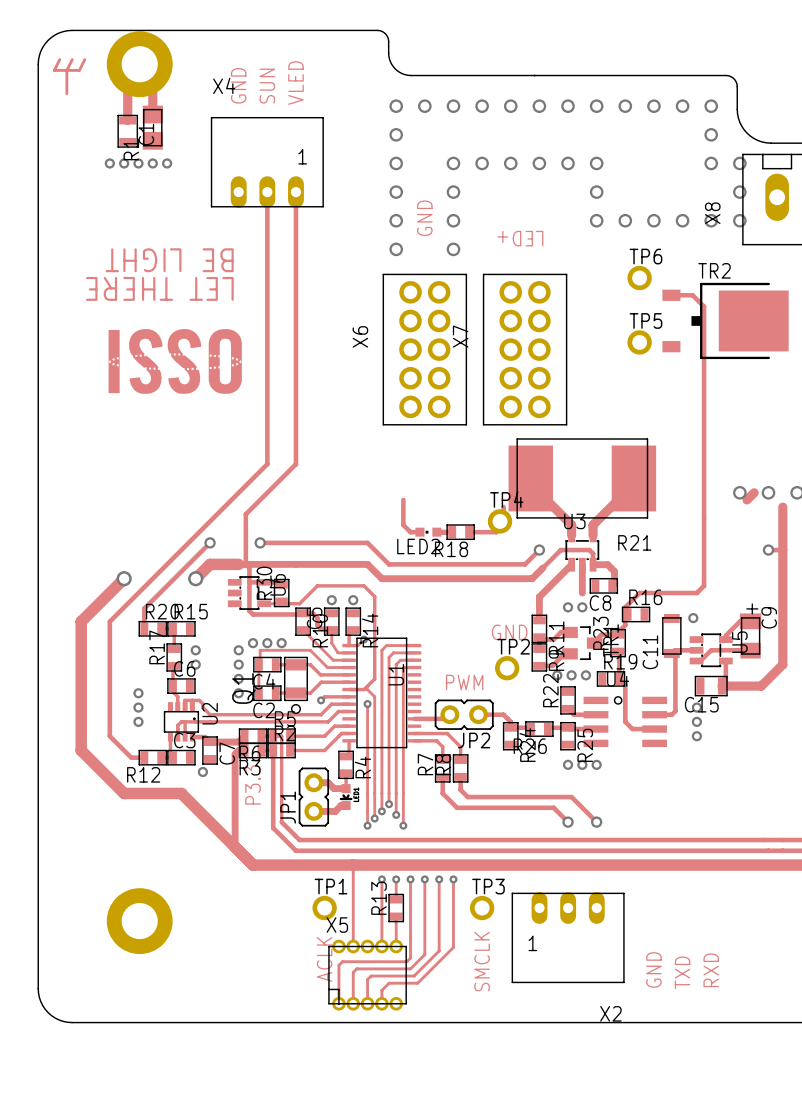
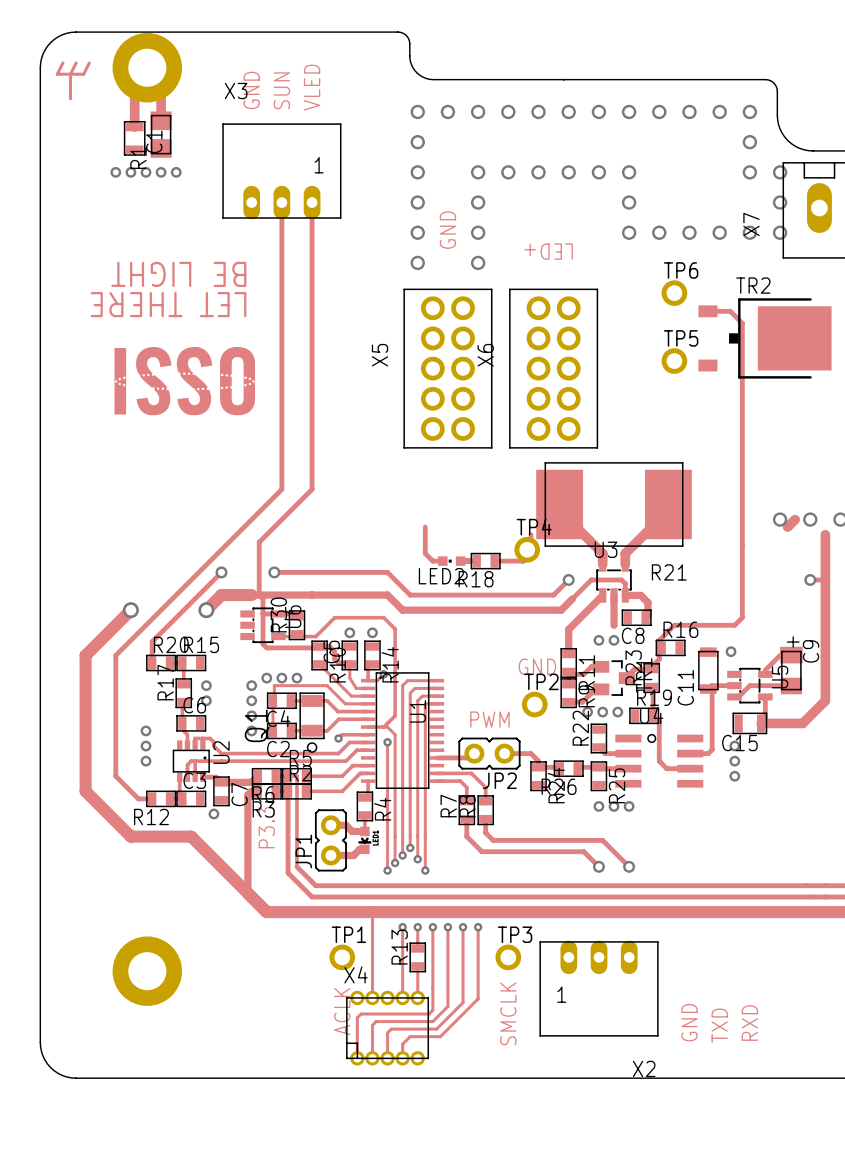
X4 name: X4 (224, 85) -> X3 (236, 90)
X8 name: X8 (712, 213) -> X7 (751, 224)
X6 name: X6 (360, 336) -> X5 (380, 355)
X7 name: X7 (460, 336) -> X6 (485, 355)
X5 name: X5 (337, 925) -> X4 (356, 974)

